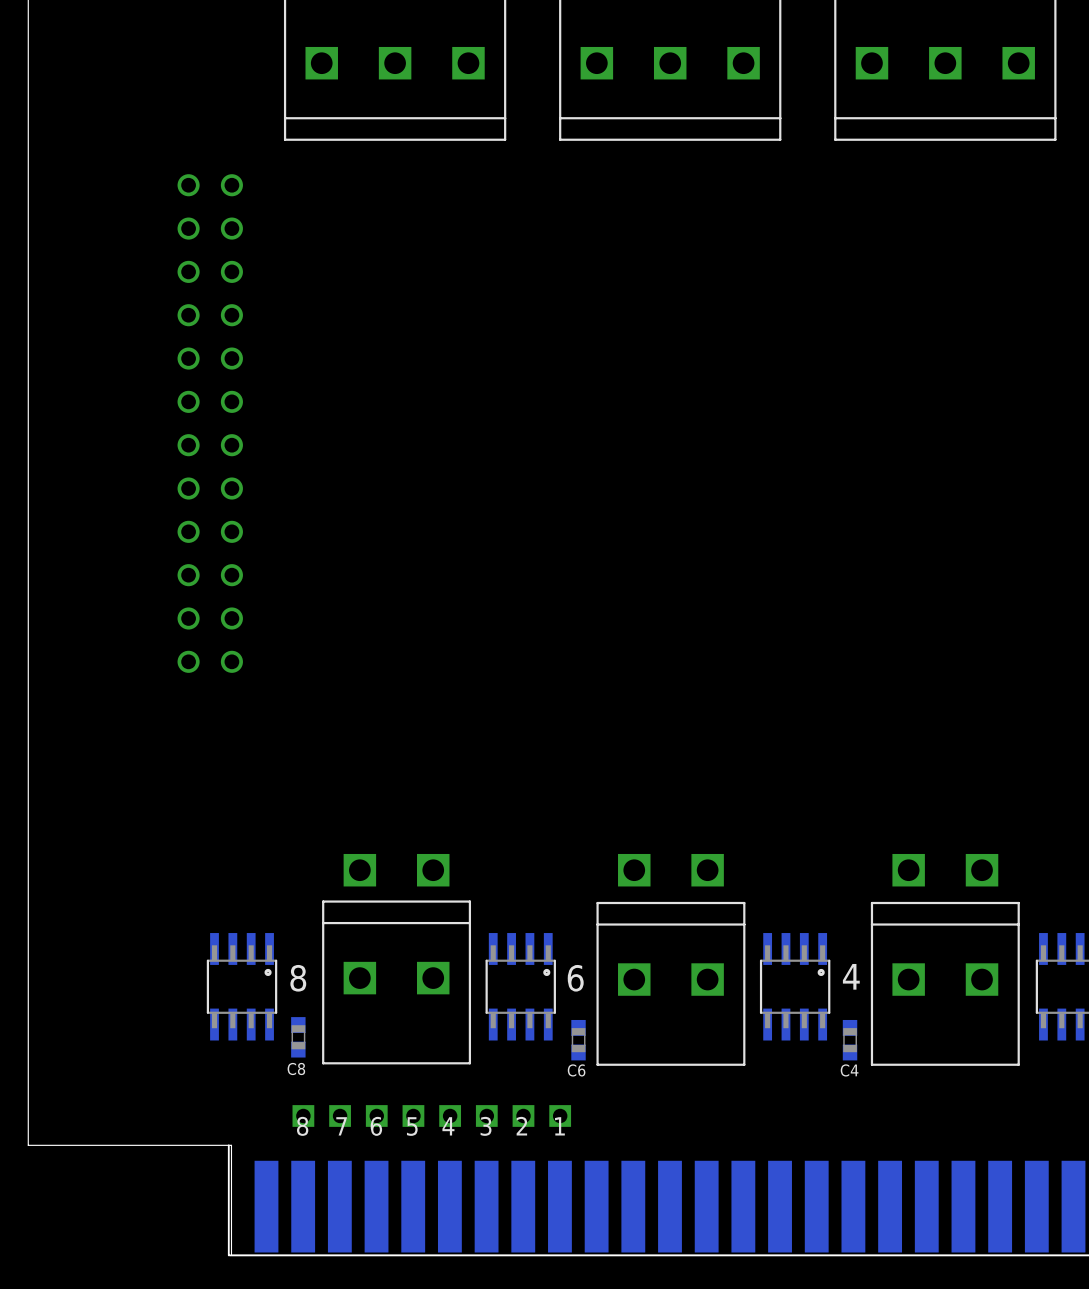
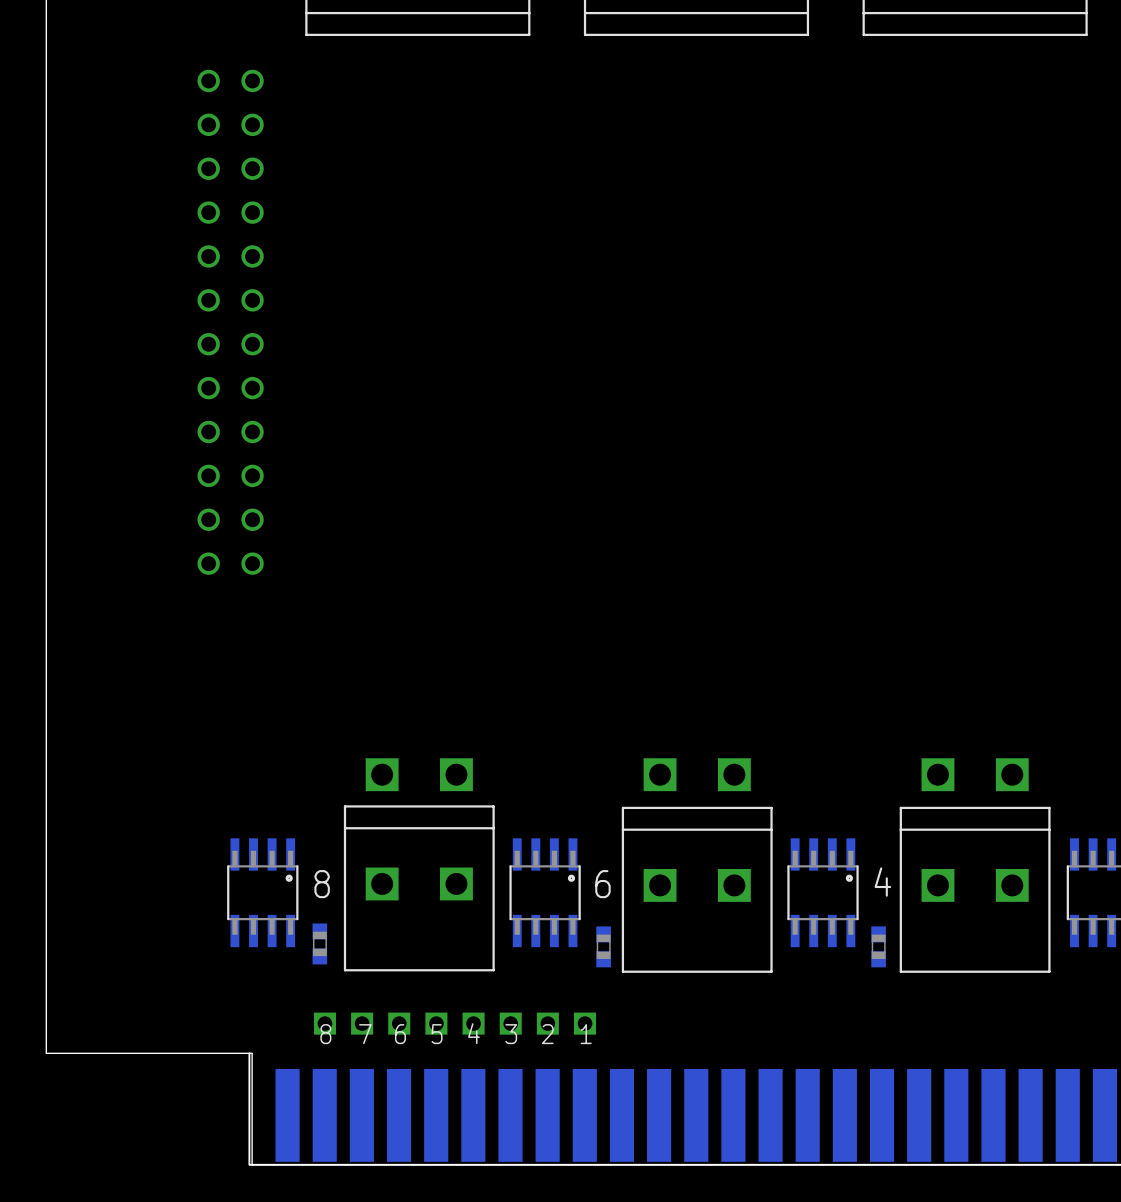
text: C8 (296, 1069) -> none
text: C6 (576, 1070) -> none
text: C4 (849, 1070) -> none

